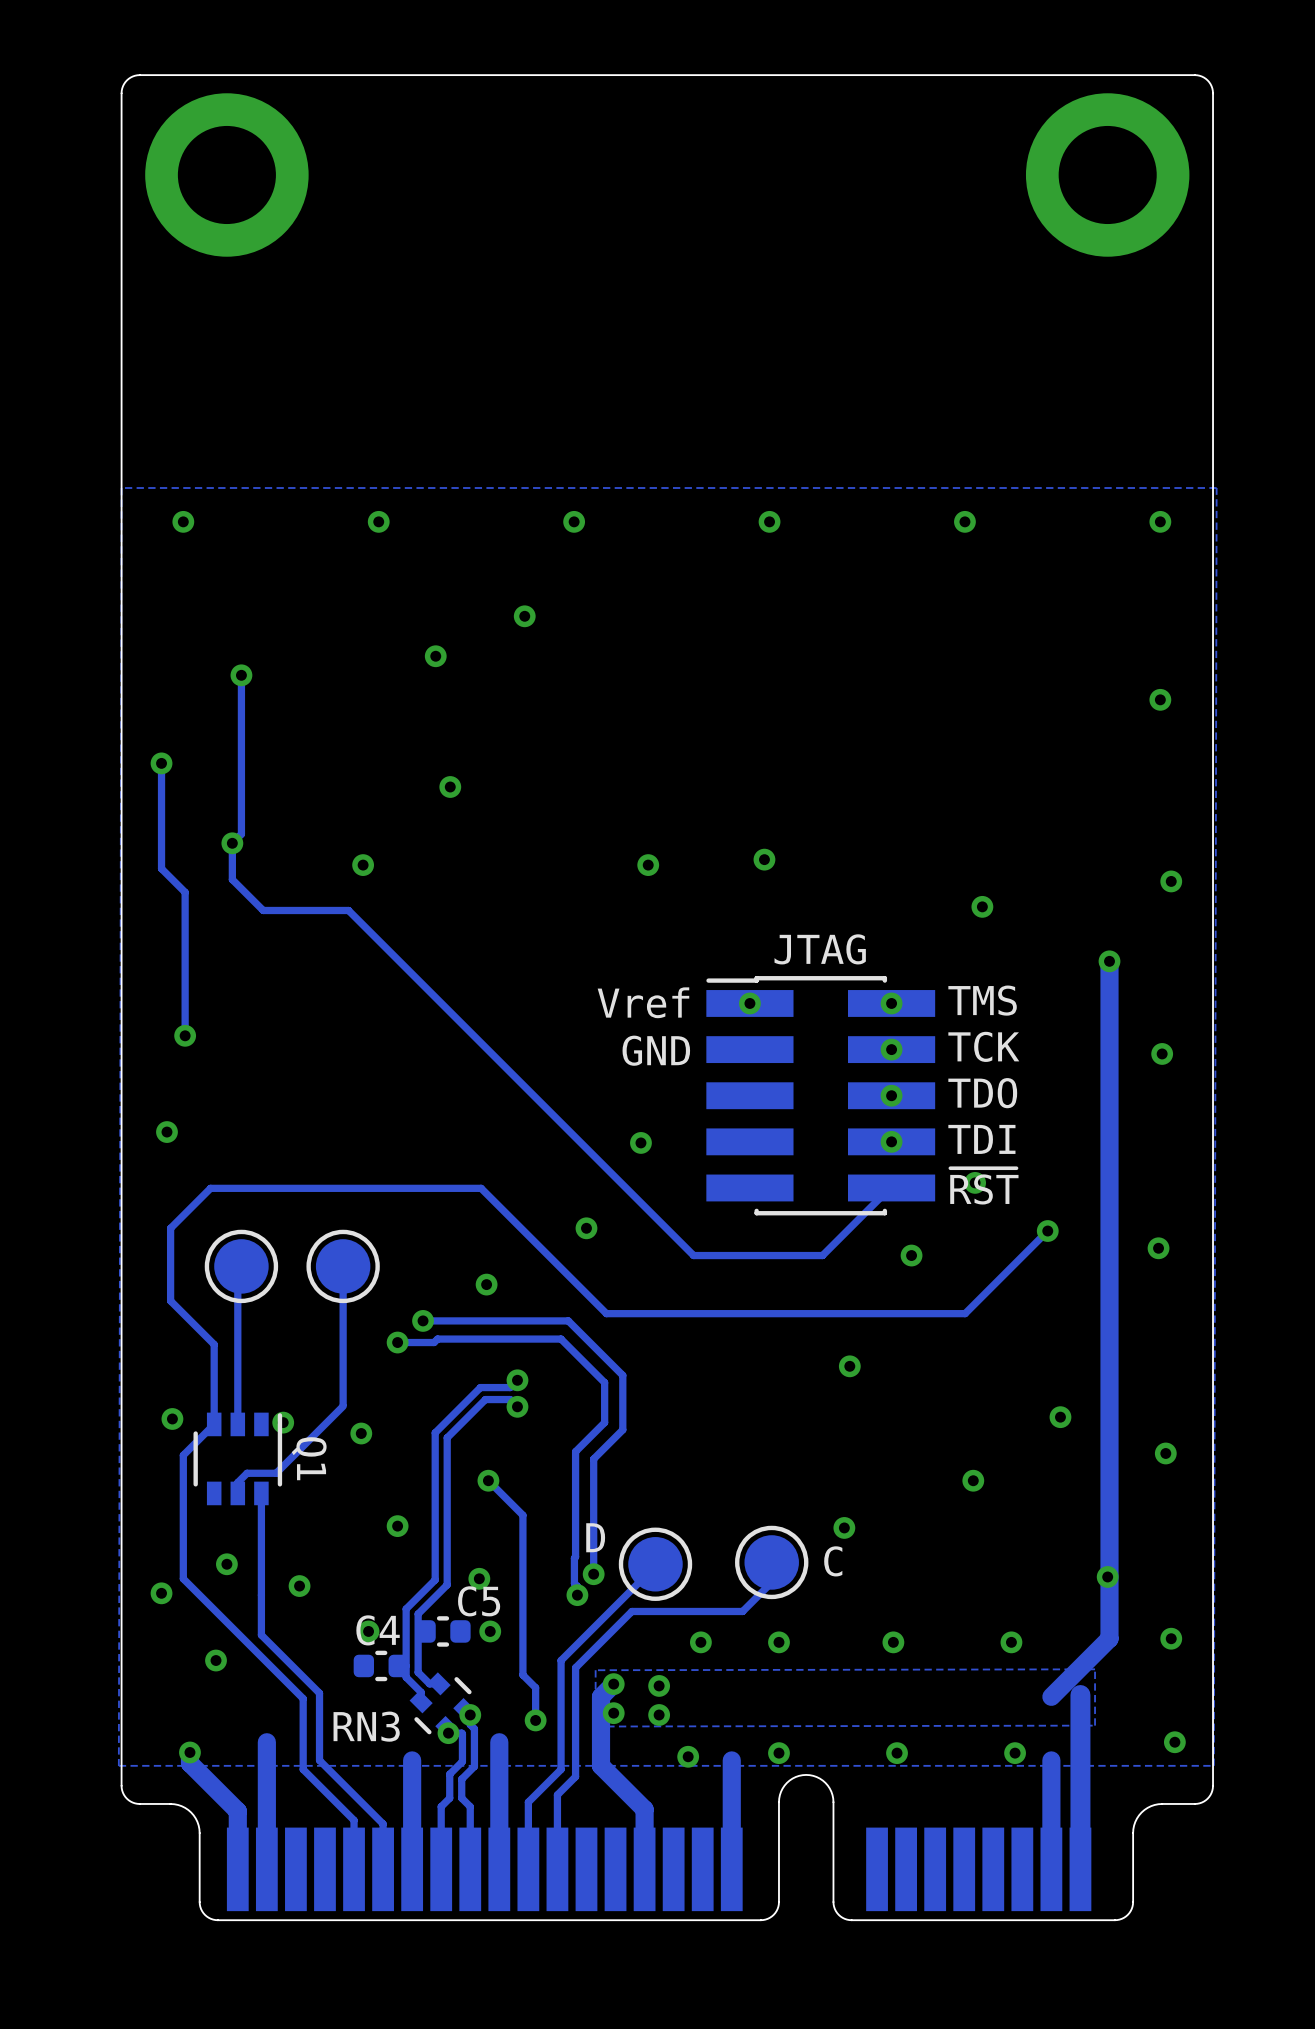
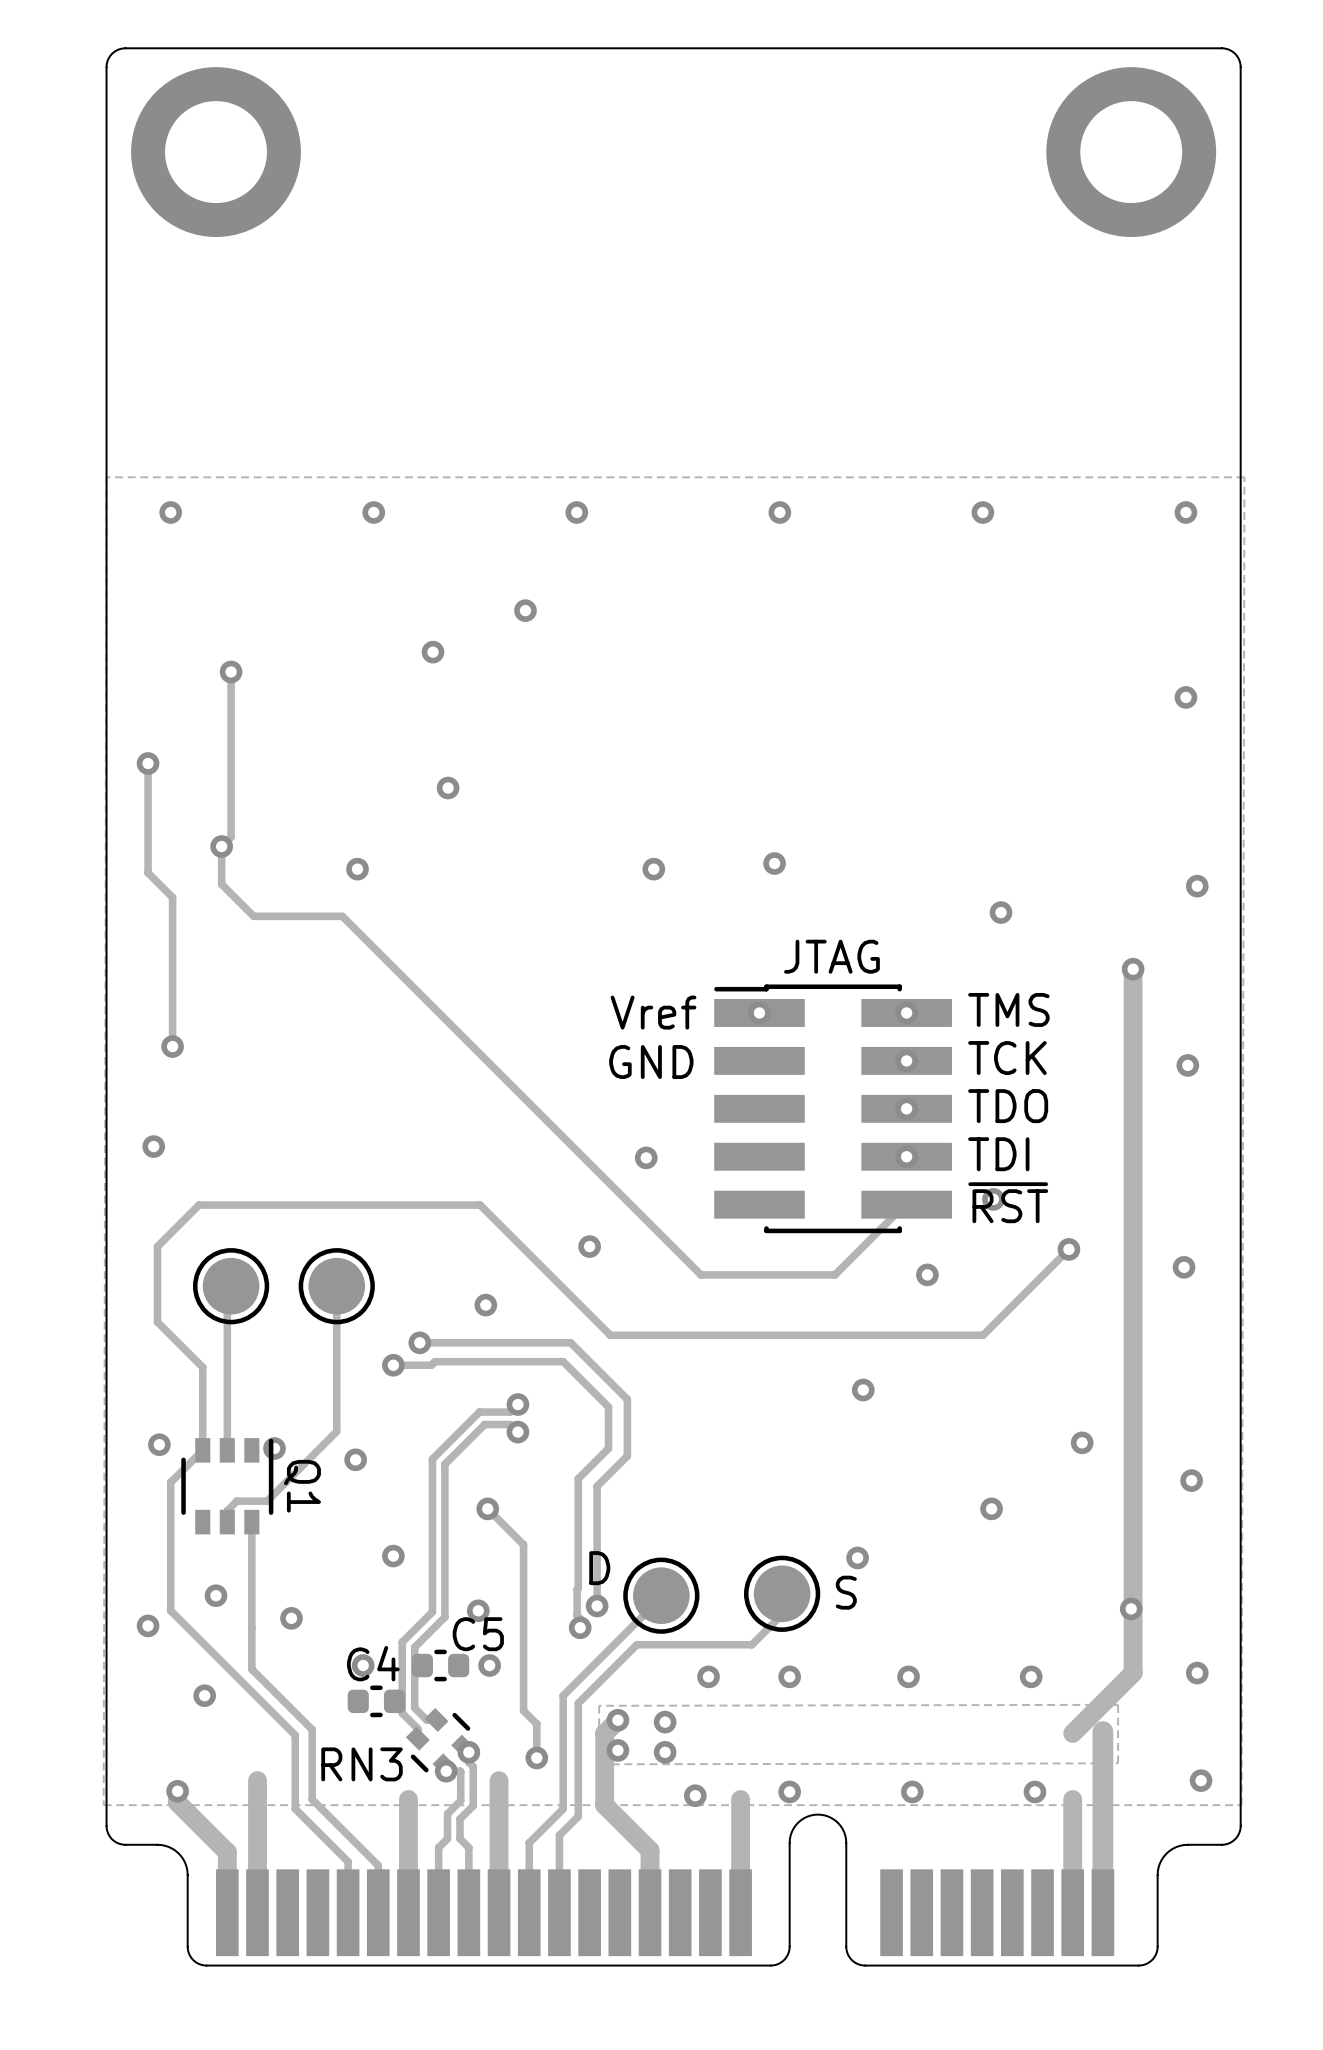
part text: C (833, 1561) -> S (846, 1592)

